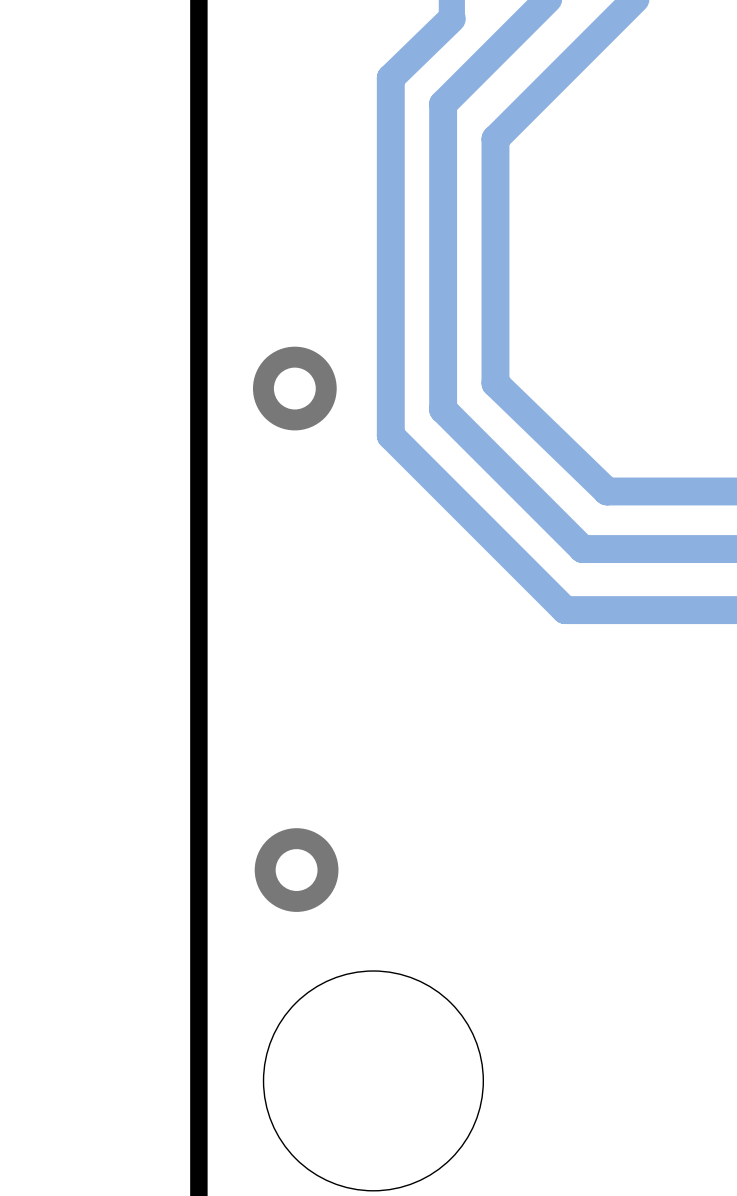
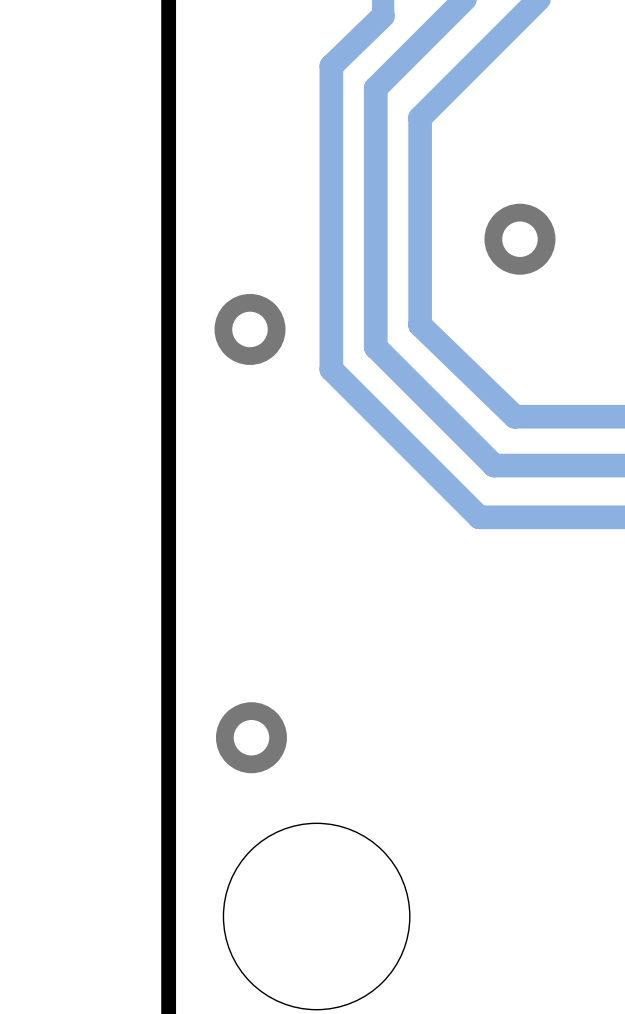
via: none -> (519, 239)

